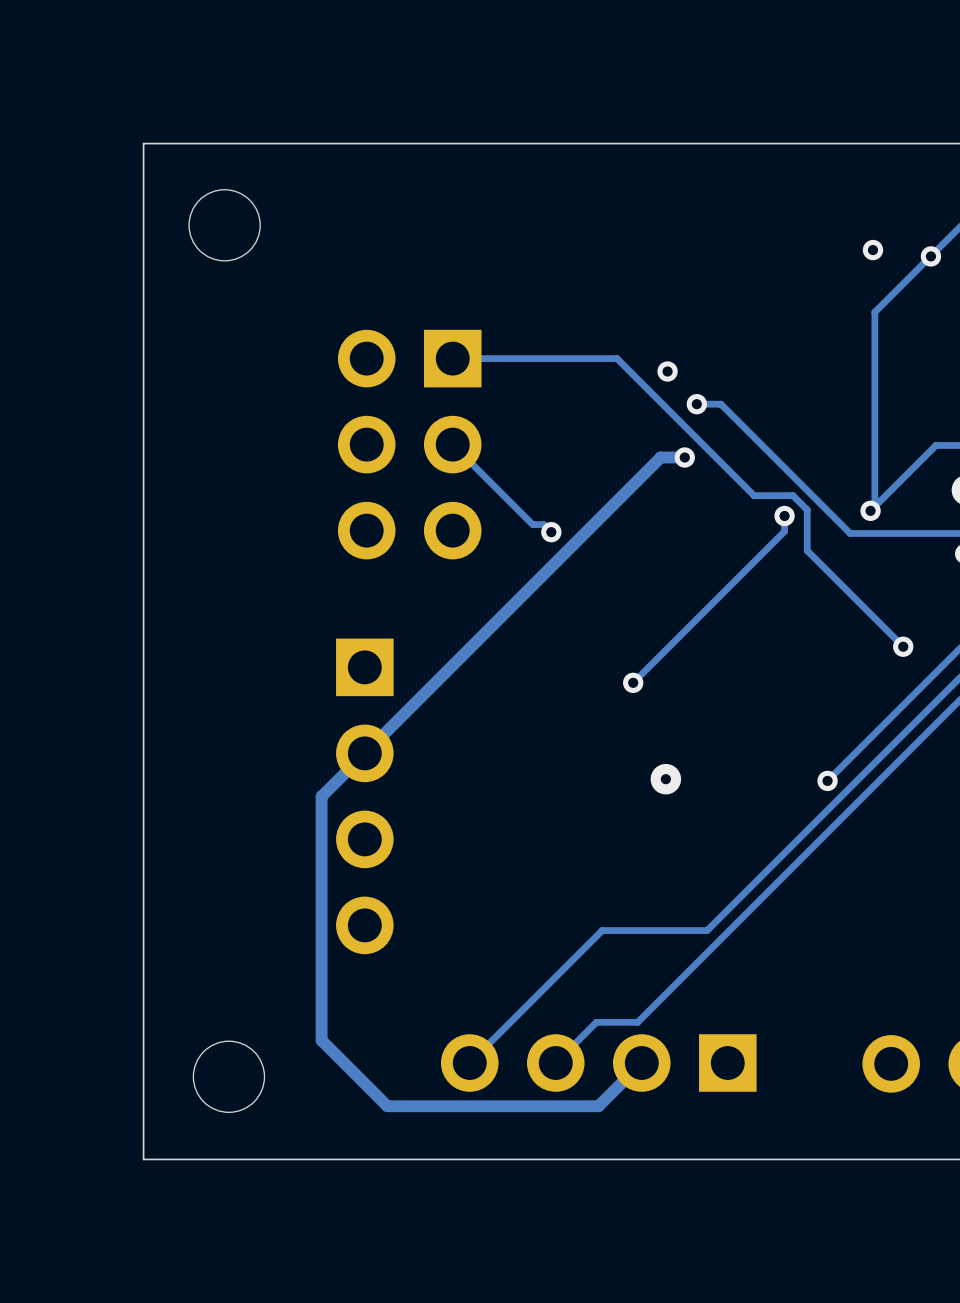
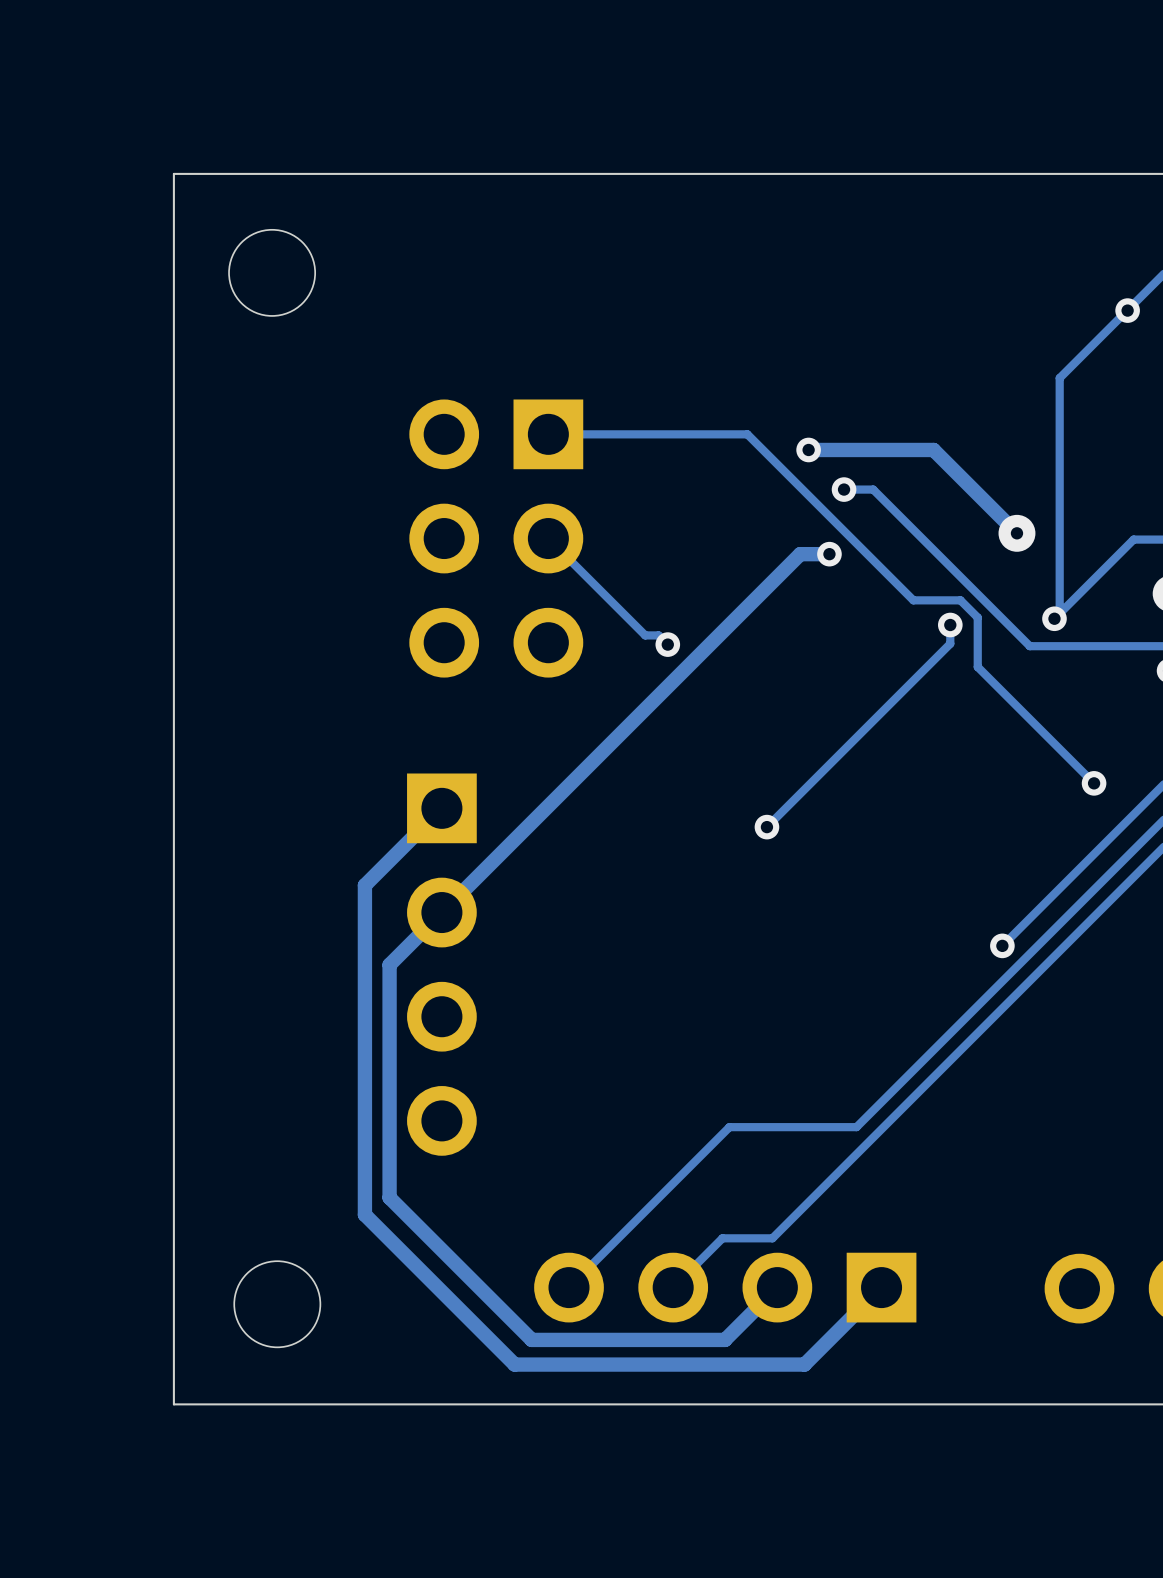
via: (872, 250) -> none
track: none -> (808, 449) (933, 449) (1016, 533)
via: none -> (1016, 533)
track: none -> (441, 808) (364, 885) (364, 1214) (514, 1364) (804, 1364) (881, 1287)
via: (665, 779) -> none
track: (321, 988) (321, 1040) (387, 1106) (439, 1106) -> (389, 1197) (531, 1339)

